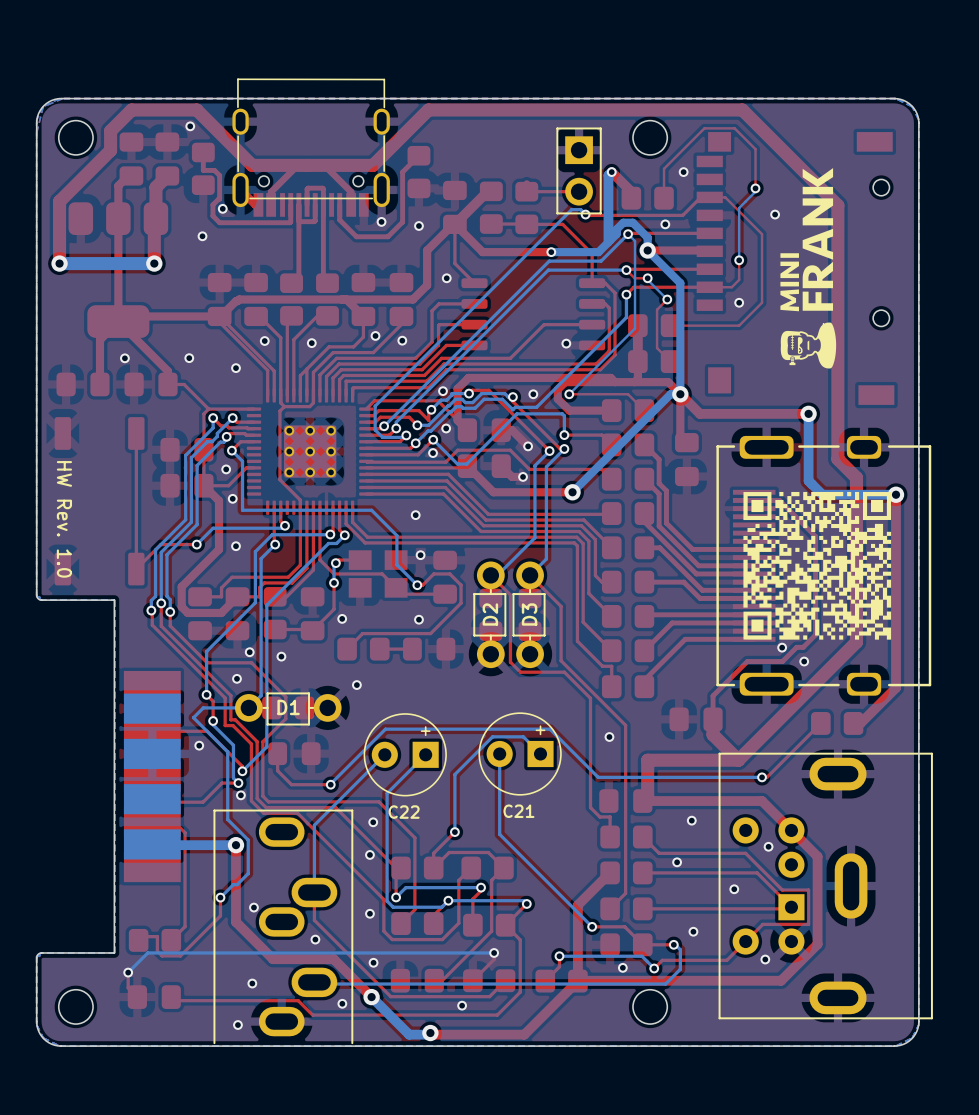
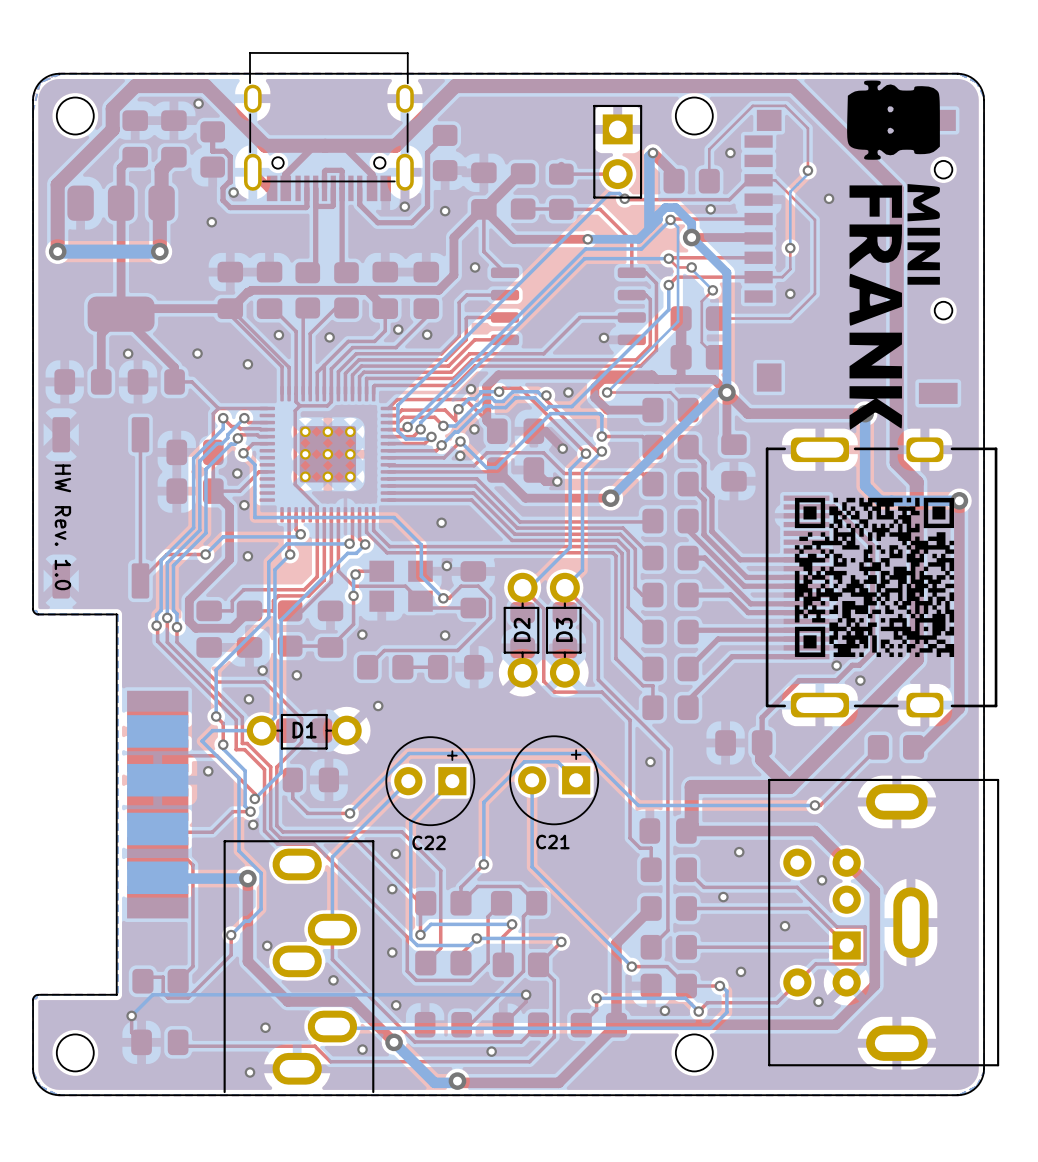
drawing: none -> [847, 80, 940, 430]
drawing: [780, 168, 837, 369] -> none

